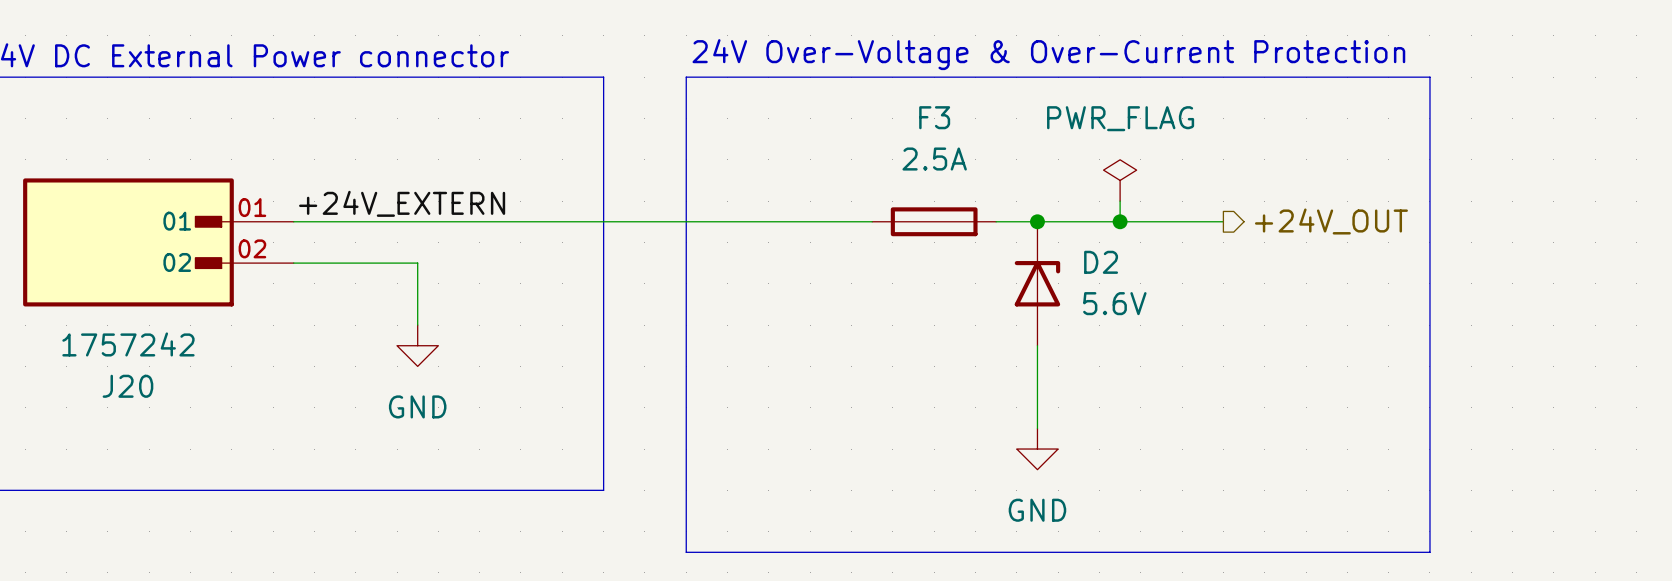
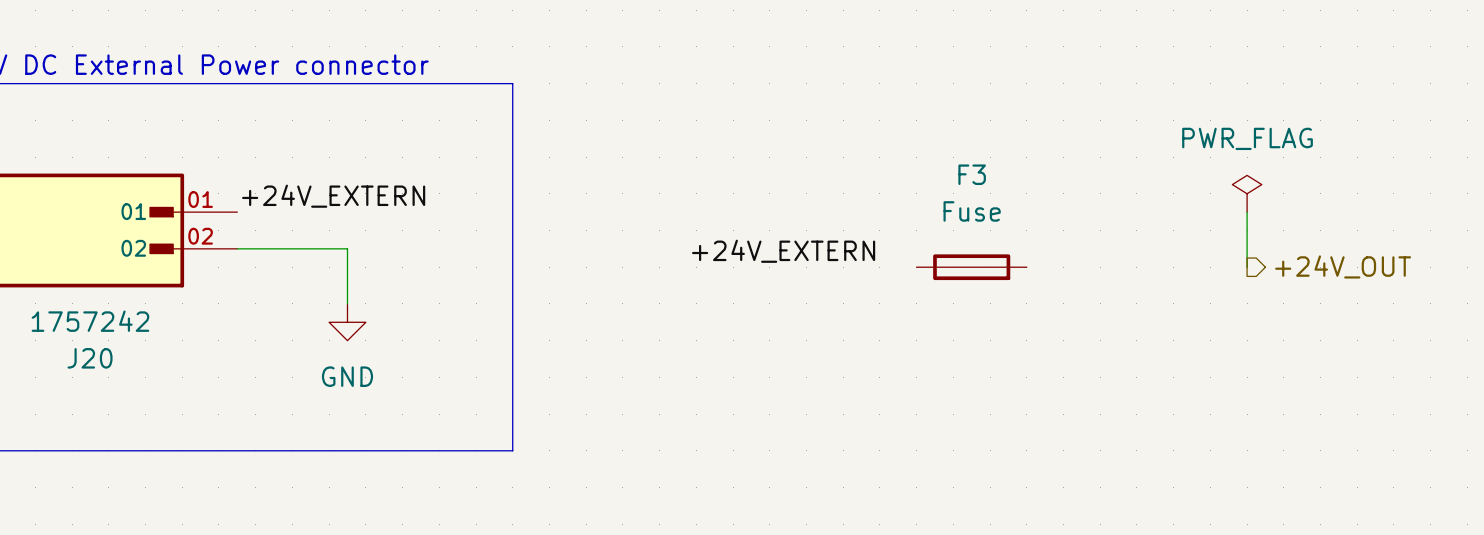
text: 24V Over-Voltage & Over-Current Protection (1048, 54) -> none
line: (686, 77) (1429, 77) (1429, 552) (686, 552) (686, 77) -> none
F3 value: 2.5A (934, 159) -> Fuse (972, 211)
power symbol position: PWR_FLAG (1120, 180) -> PWR_FLAG (1247, 193)
wire: (1120, 201) (1120, 221) -> none
wire: (293, 221) (872, 221) -> none
F3 position: (934, 221) -> (971, 267)
wire: (996, 221) (1223, 221) -> none
junction: (1037, 221) -> none
junction: (1120, 221) -> none
hierarchical label position: +24V_OUT (1331, 221) -> +24V_OUT (1343, 266)
label: none -> +24V_EXTERN (783, 251)
D2: 5.6V (1037, 283) -> none
wire: (1037, 345) (1037, 428) -> none
power symbol: GND (1037, 449) -> none

